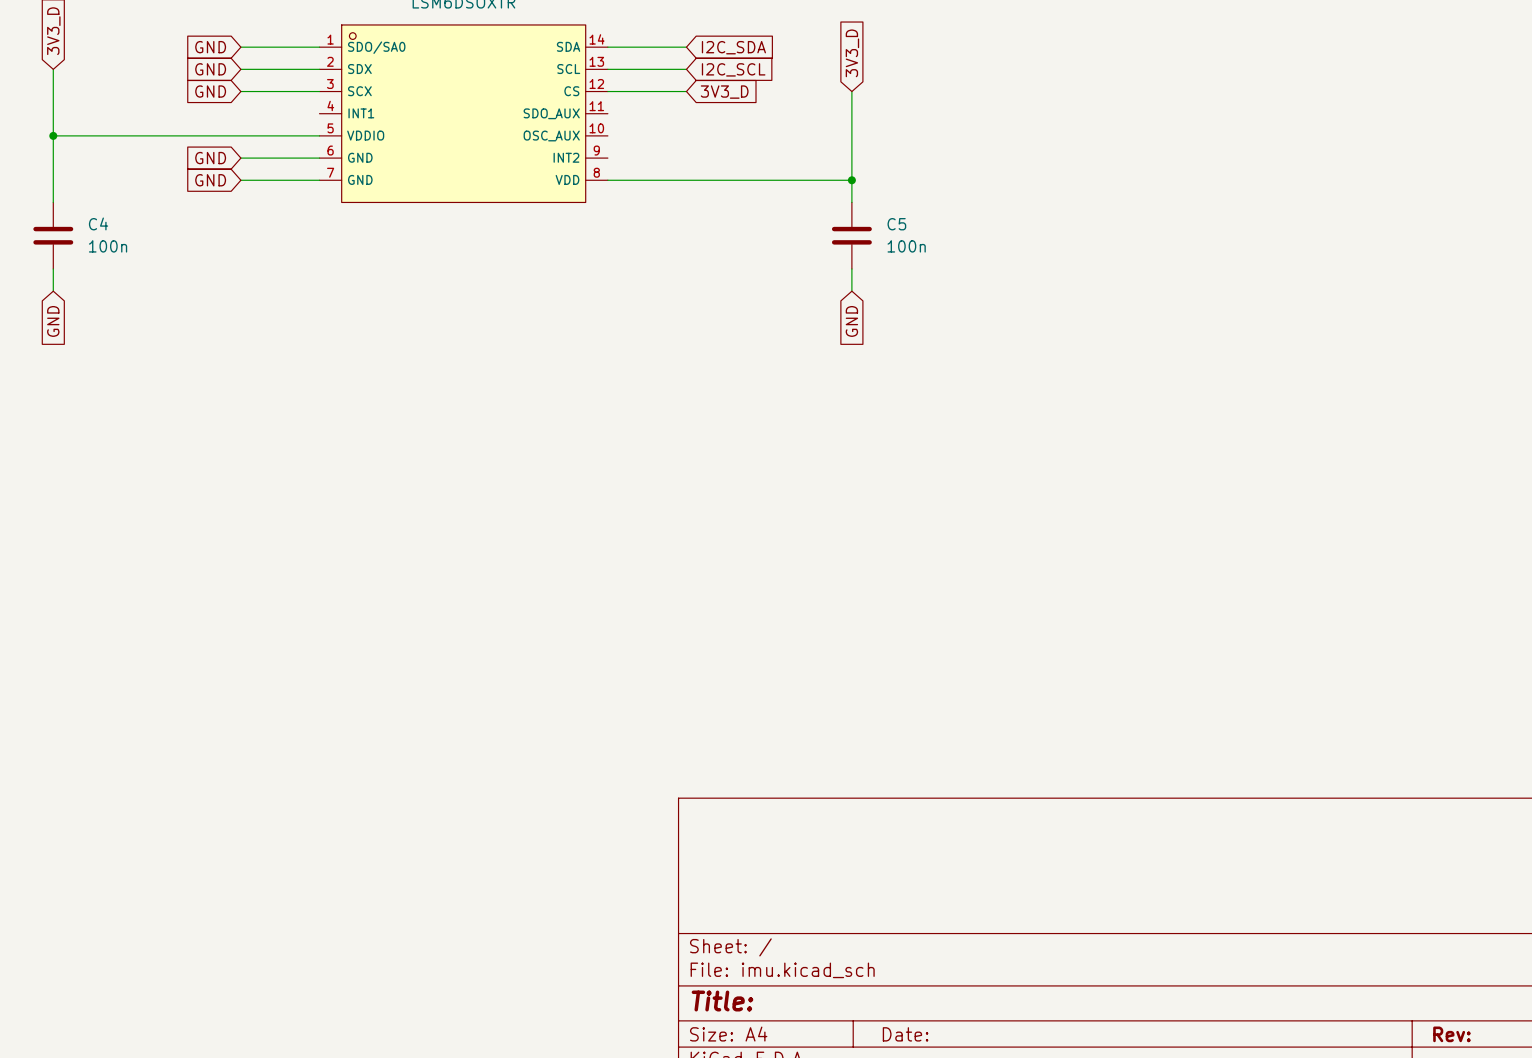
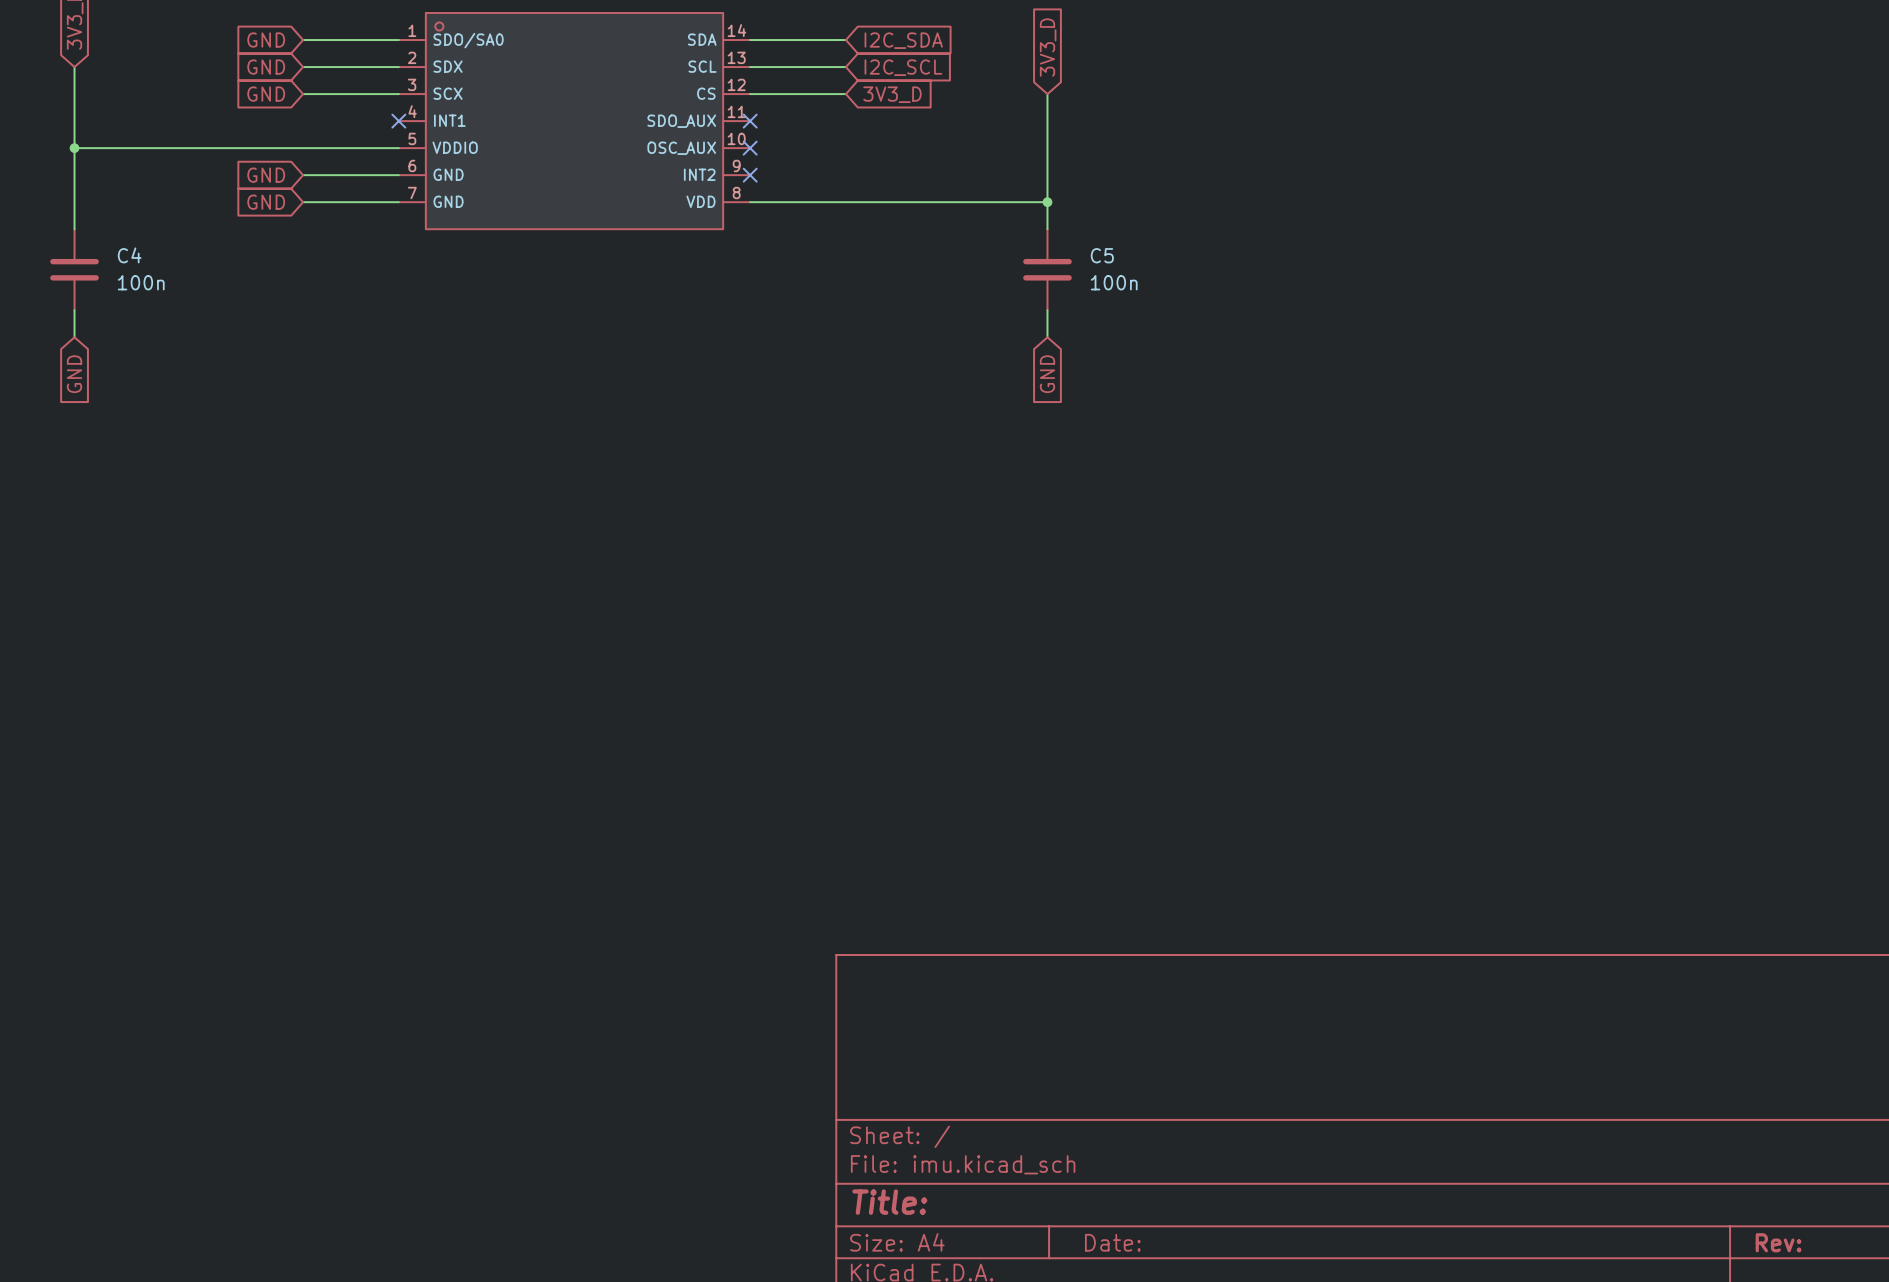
no-connect mark: none -> (398, 121)
no-connect mark: none -> (750, 121)
no-connect mark: none -> (750, 148)
no-connect mark: none -> (750, 175)

